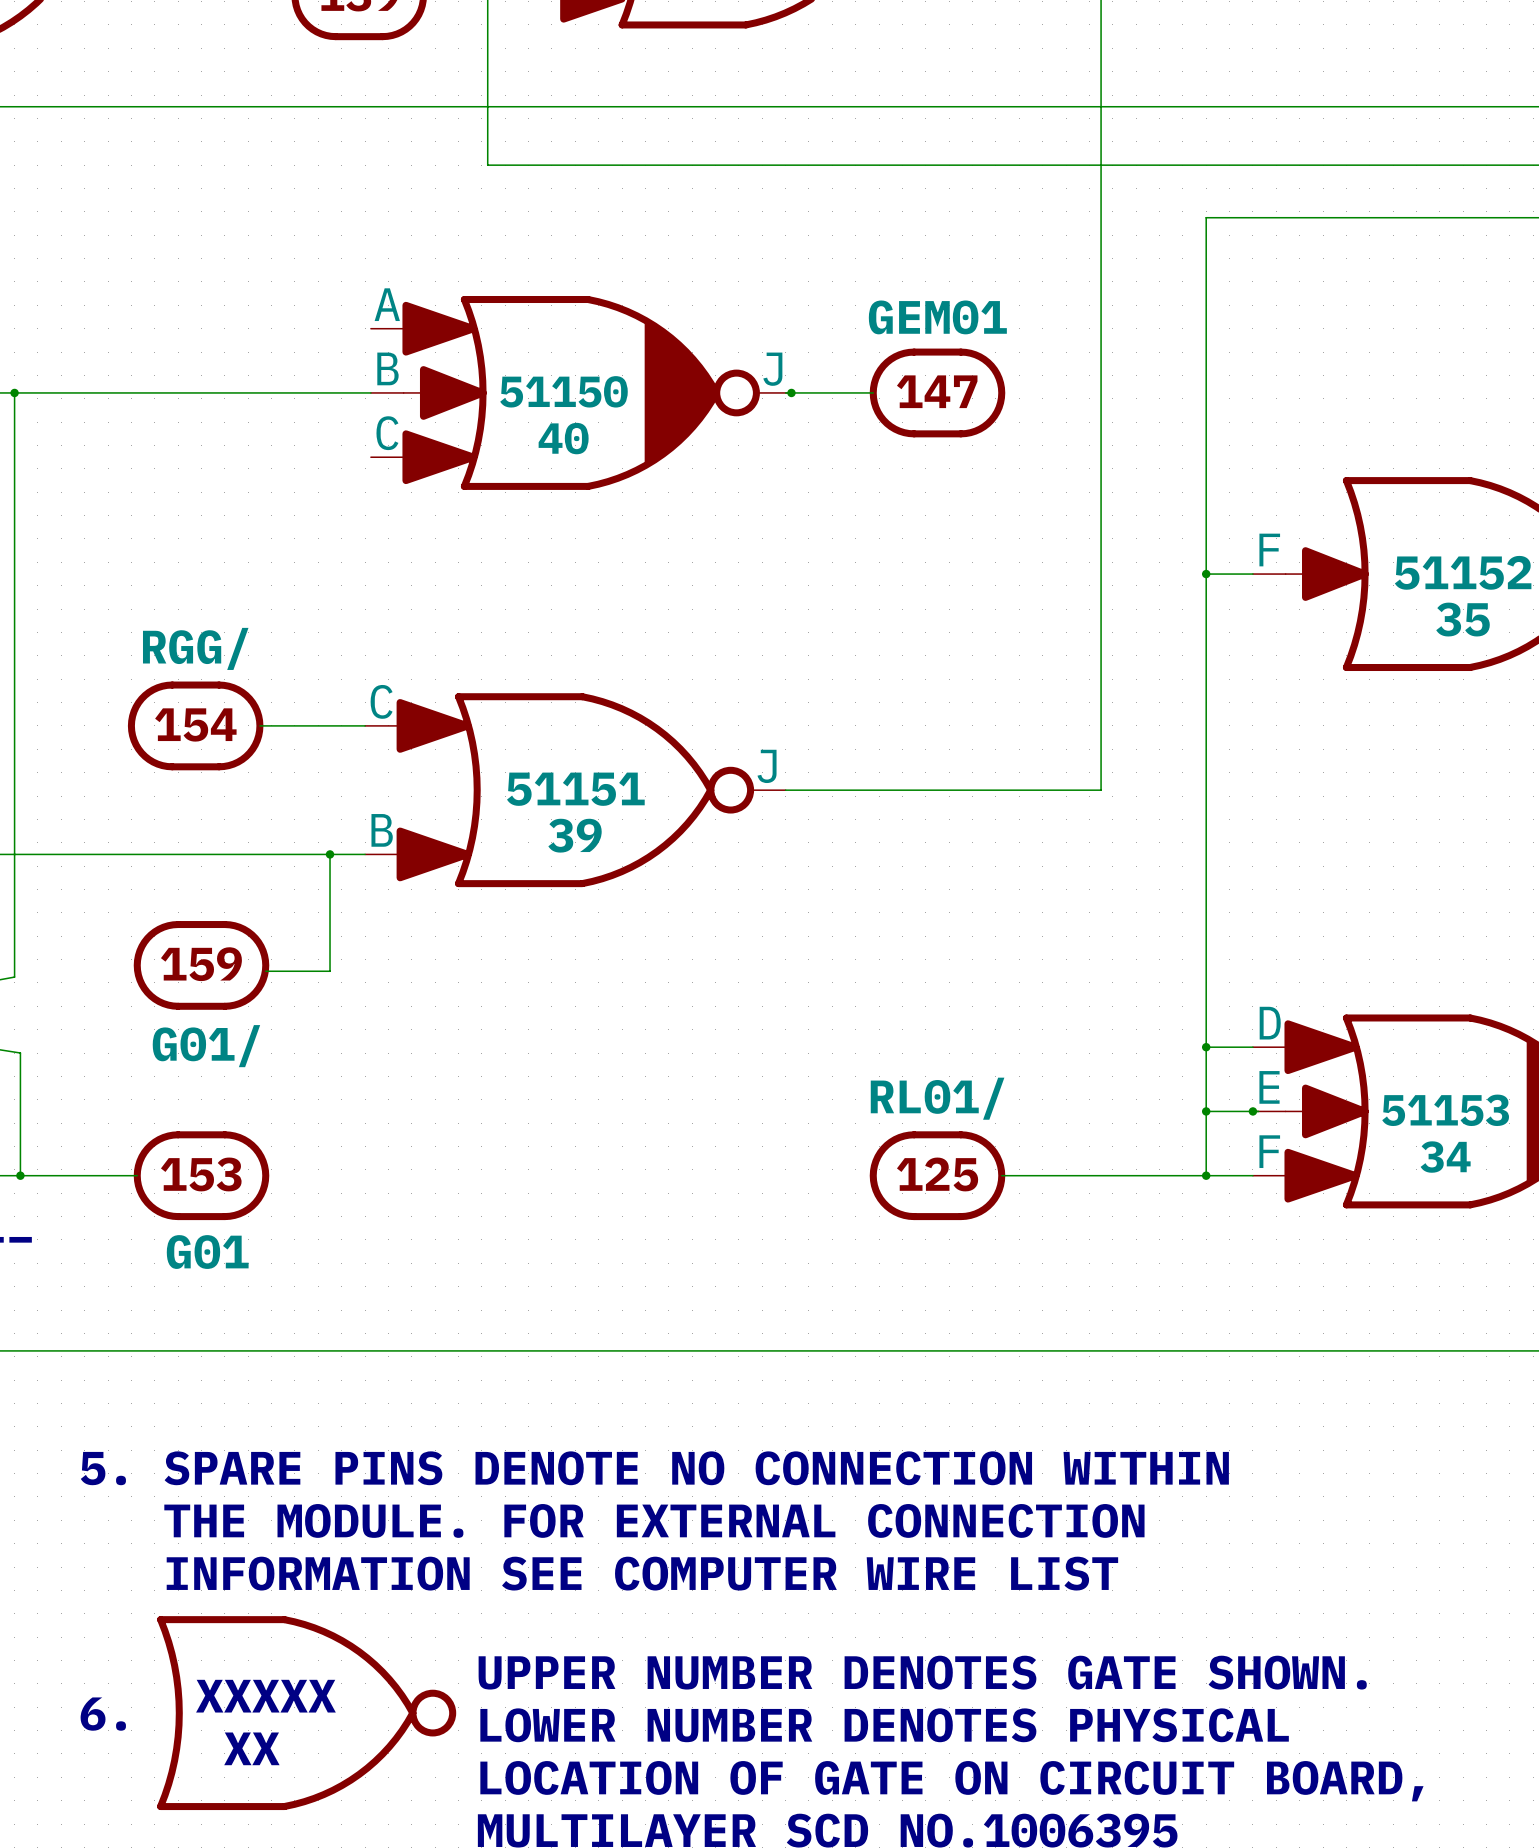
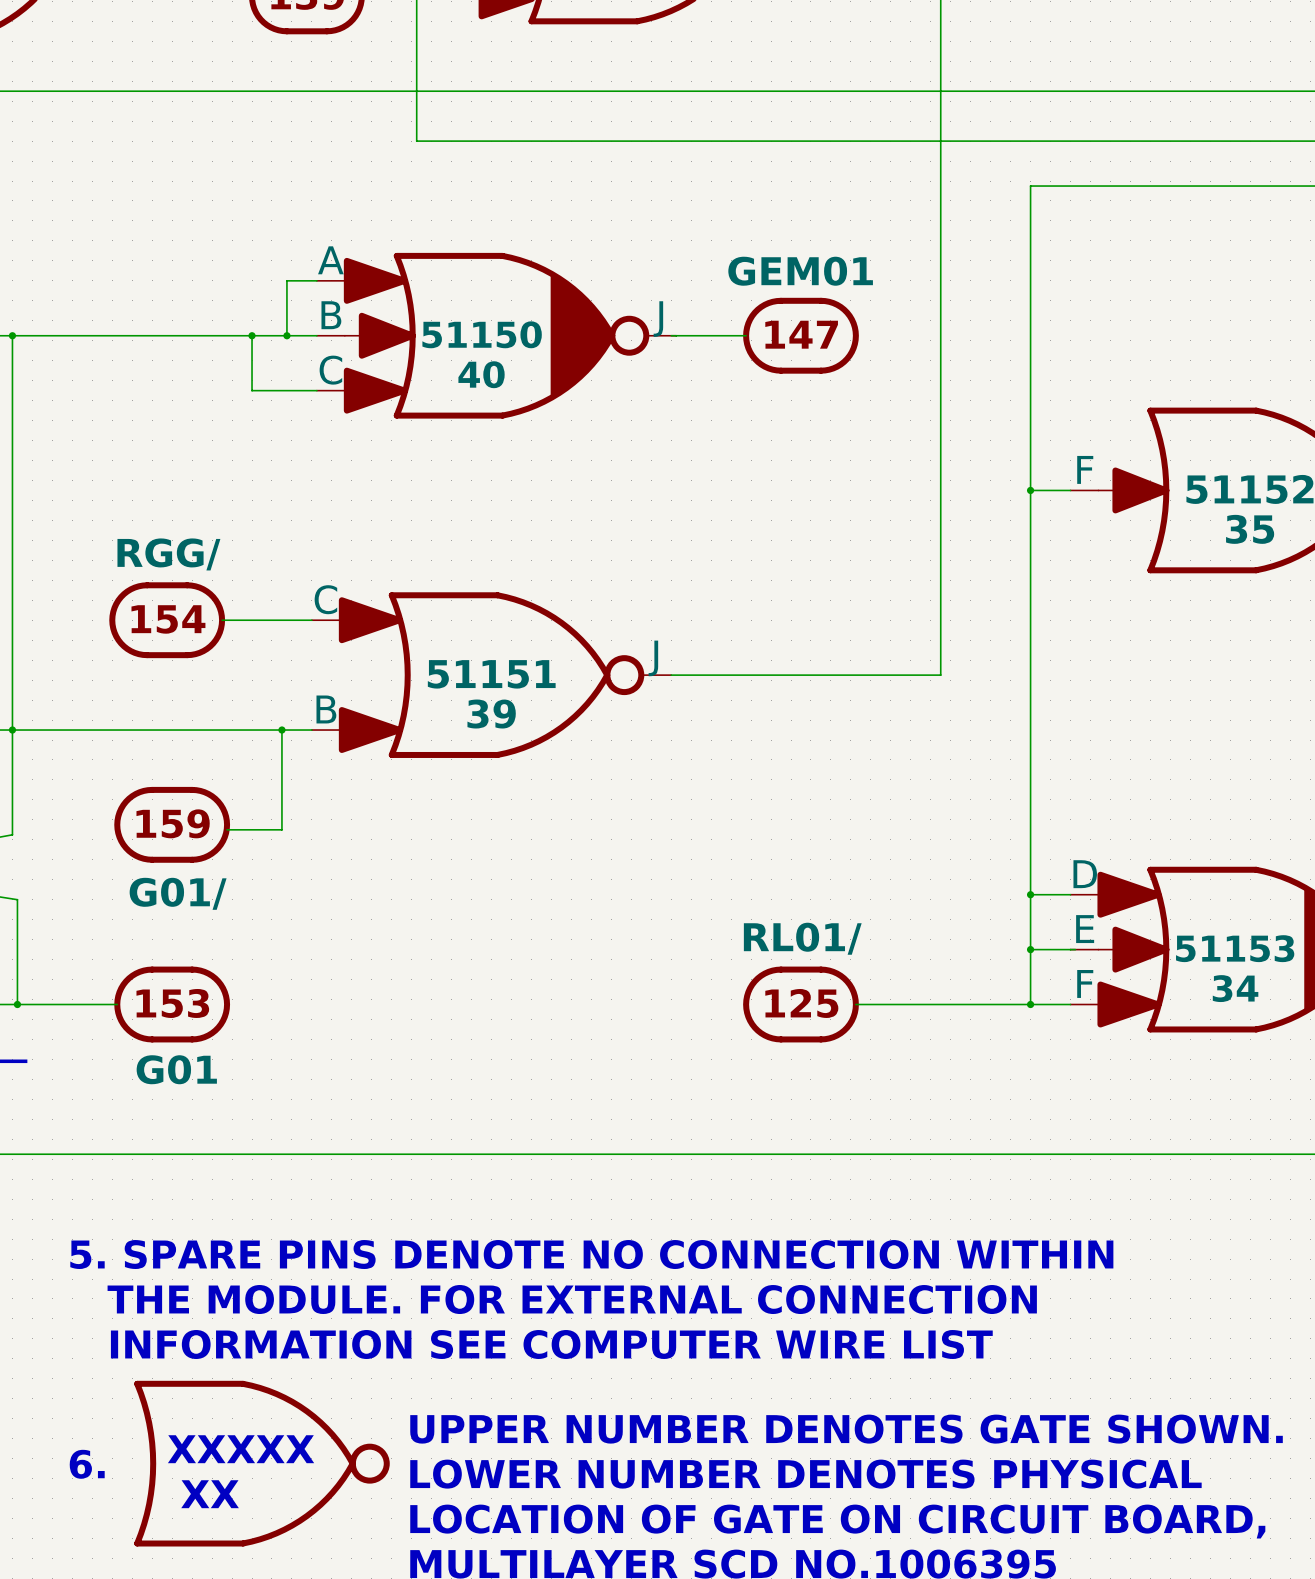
wire: none -> (316, 280) (286, 280) (286, 335)
wire: none -> (252, 335) (252, 390) (316, 390)
junction: none -> (252, 335)
junction: none -> (286, 335)
junction: (791, 392) -> none
junction: none -> (12, 730)
junction: (1252, 1111) -> none

